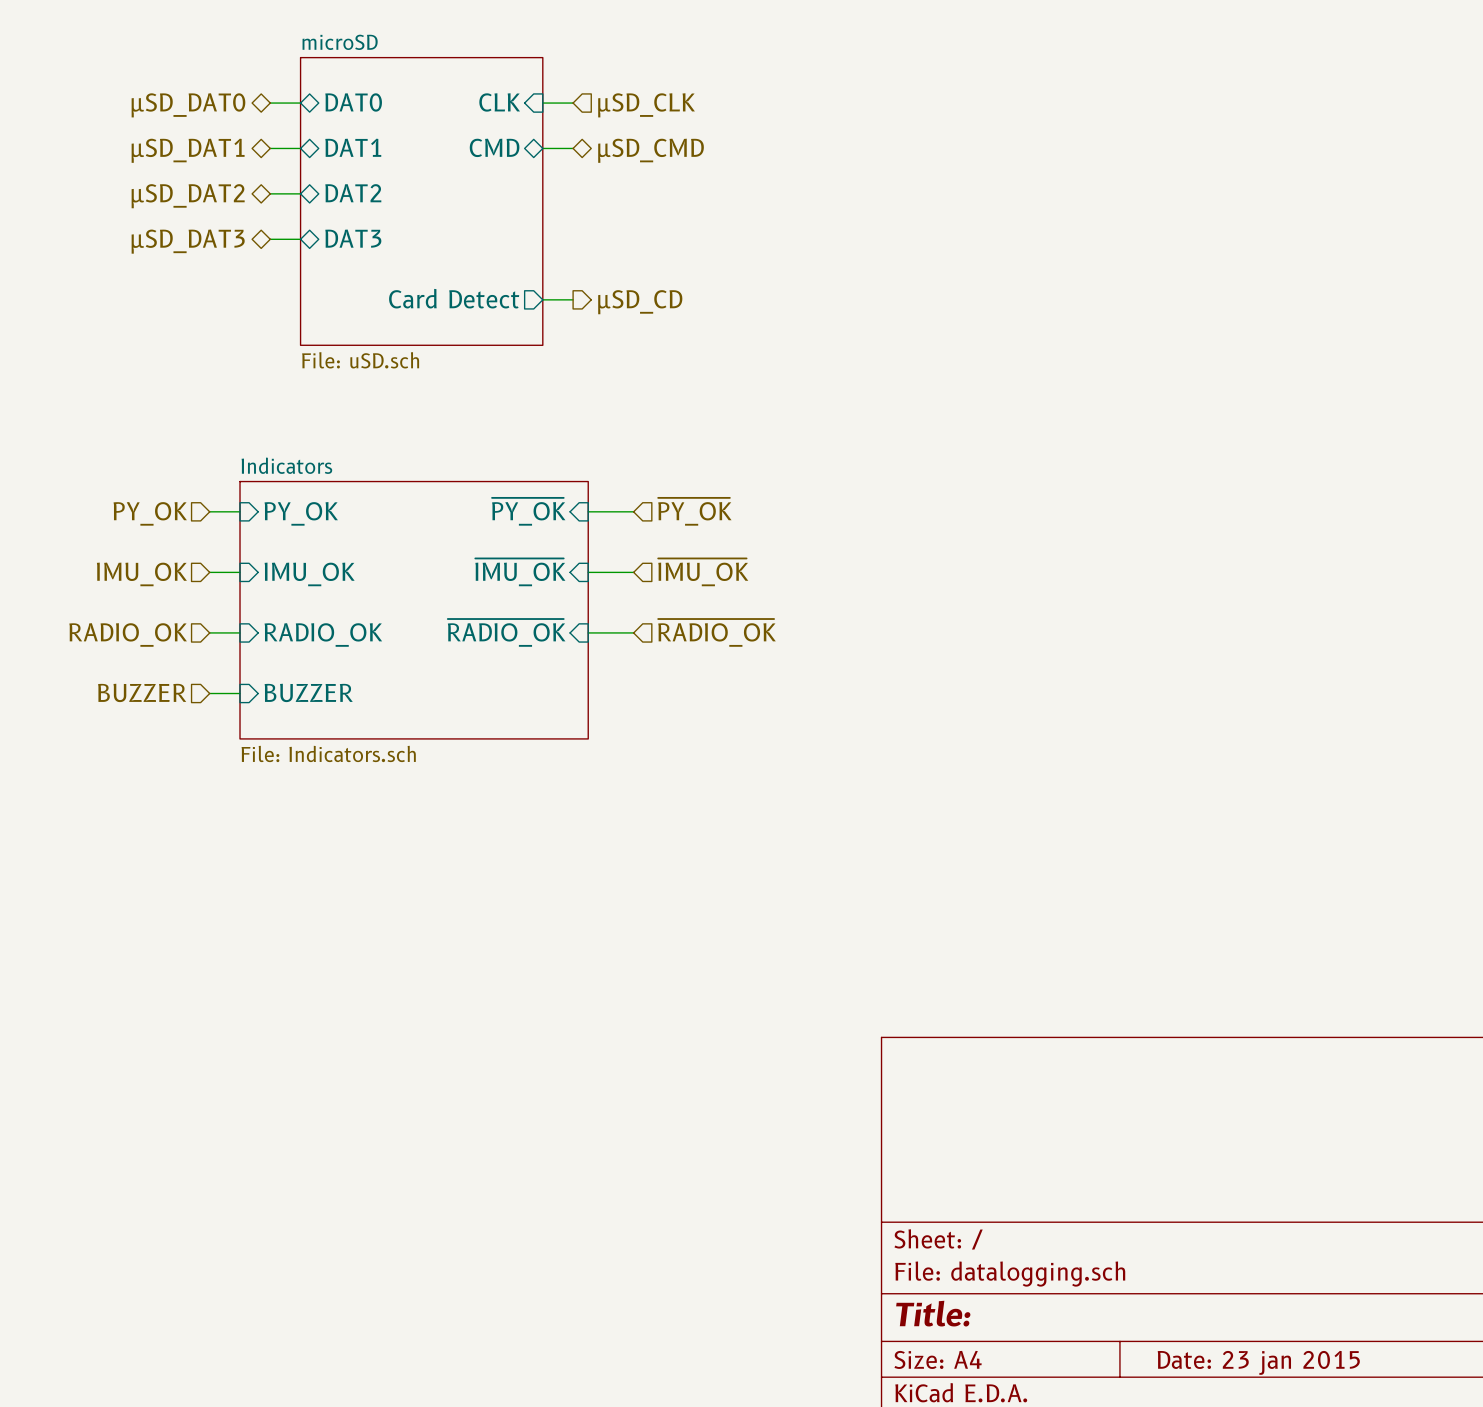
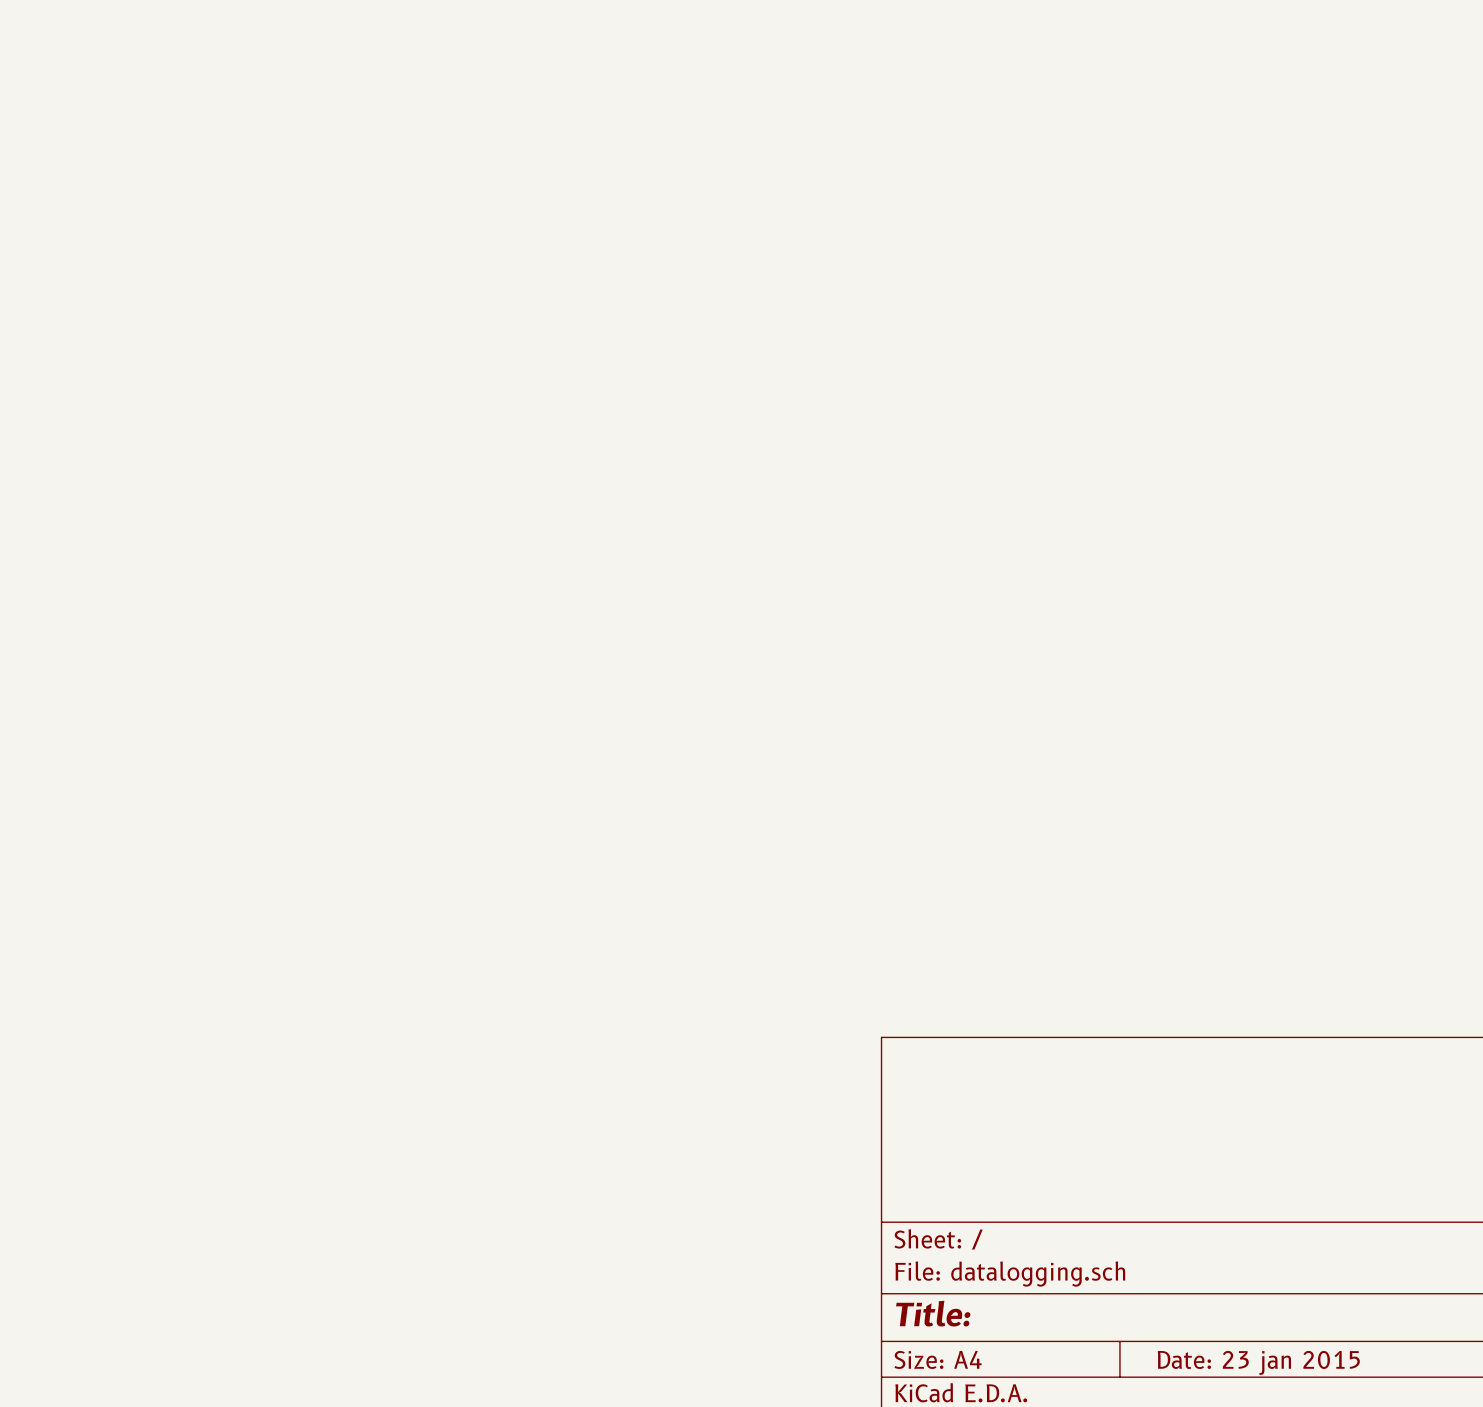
sheet pin: DAT0 (353, 102) -> none
sheet pin: CLK (499, 102) -> none
wire: (270, 103) (300, 103) -> none
wire: (542, 103) (573, 103) -> none
hierarchical label: µSD_DAT0 (188, 105) -> none
hierarchical label: µSD_CLK (646, 105) -> none
sheet pin: DAT1 (353, 147) -> none
sheet pin: CMD (494, 147) -> none
wire: (270, 148) (300, 148) -> none
wire: (542, 148) (573, 148) -> none
hierarchical label: µSD_DAT1 (188, 150) -> none
hierarchical label: µSD_CMD (651, 150) -> none
wire: (270, 193) (300, 193) -> none
sheet pin: DAT2 (353, 193) -> none
hierarchical label: µSD_DAT2 (188, 196) -> none
sheet microSD: File: uSD.sch (421, 201) -> none
sheet pin: DAT3 (353, 238) -> none
wire: (270, 239) (300, 239) -> none
hierarchical label: µSD_DAT3 (188, 241) -> none
sheet pin: Card Detect (454, 298) -> none
wire: (542, 299) (573, 299) -> none
hierarchical label: µSD_CD (640, 302) -> none
wire: (209, 511) (240, 511) -> none
sheet pin: ~{PY_OK} (528, 511) -> none
wire: (588, 511) (633, 511) -> none
hierarchical label: ~{PY_OK} (694, 511) -> none
hierarchical label: PY_OK (150, 513) -> none
sheet pin: PY_OK (301, 513) -> none
wire: (209, 572) (240, 572) -> none
sheet pin: ~{IMU_OK} (520, 572) -> none
wire: (588, 572) (633, 572) -> none
hierarchical label: ~{IMU_OK} (703, 572) -> none
hierarchical label: IMU_OK (141, 574) -> none
sheet pin: IMU_OK (309, 574) -> none
sheet Indicators: File: Indicators.sch (414, 610) -> none
wire: (209, 632) (240, 632) -> none
sheet pin: ~{RADIO_OK} (506, 632) -> none
wire: (588, 632) (633, 632) -> none
hierarchical label: ~{RADIO_OK} (716, 632) -> none
hierarchical label: RADIO_OK (128, 634) -> none
sheet pin: RADIO_OK (323, 634) -> none
hierarchical label: BUZZER (142, 692) -> none
sheet pin: BUZZER (308, 692) -> none
wire: (209, 693) (240, 693) -> none

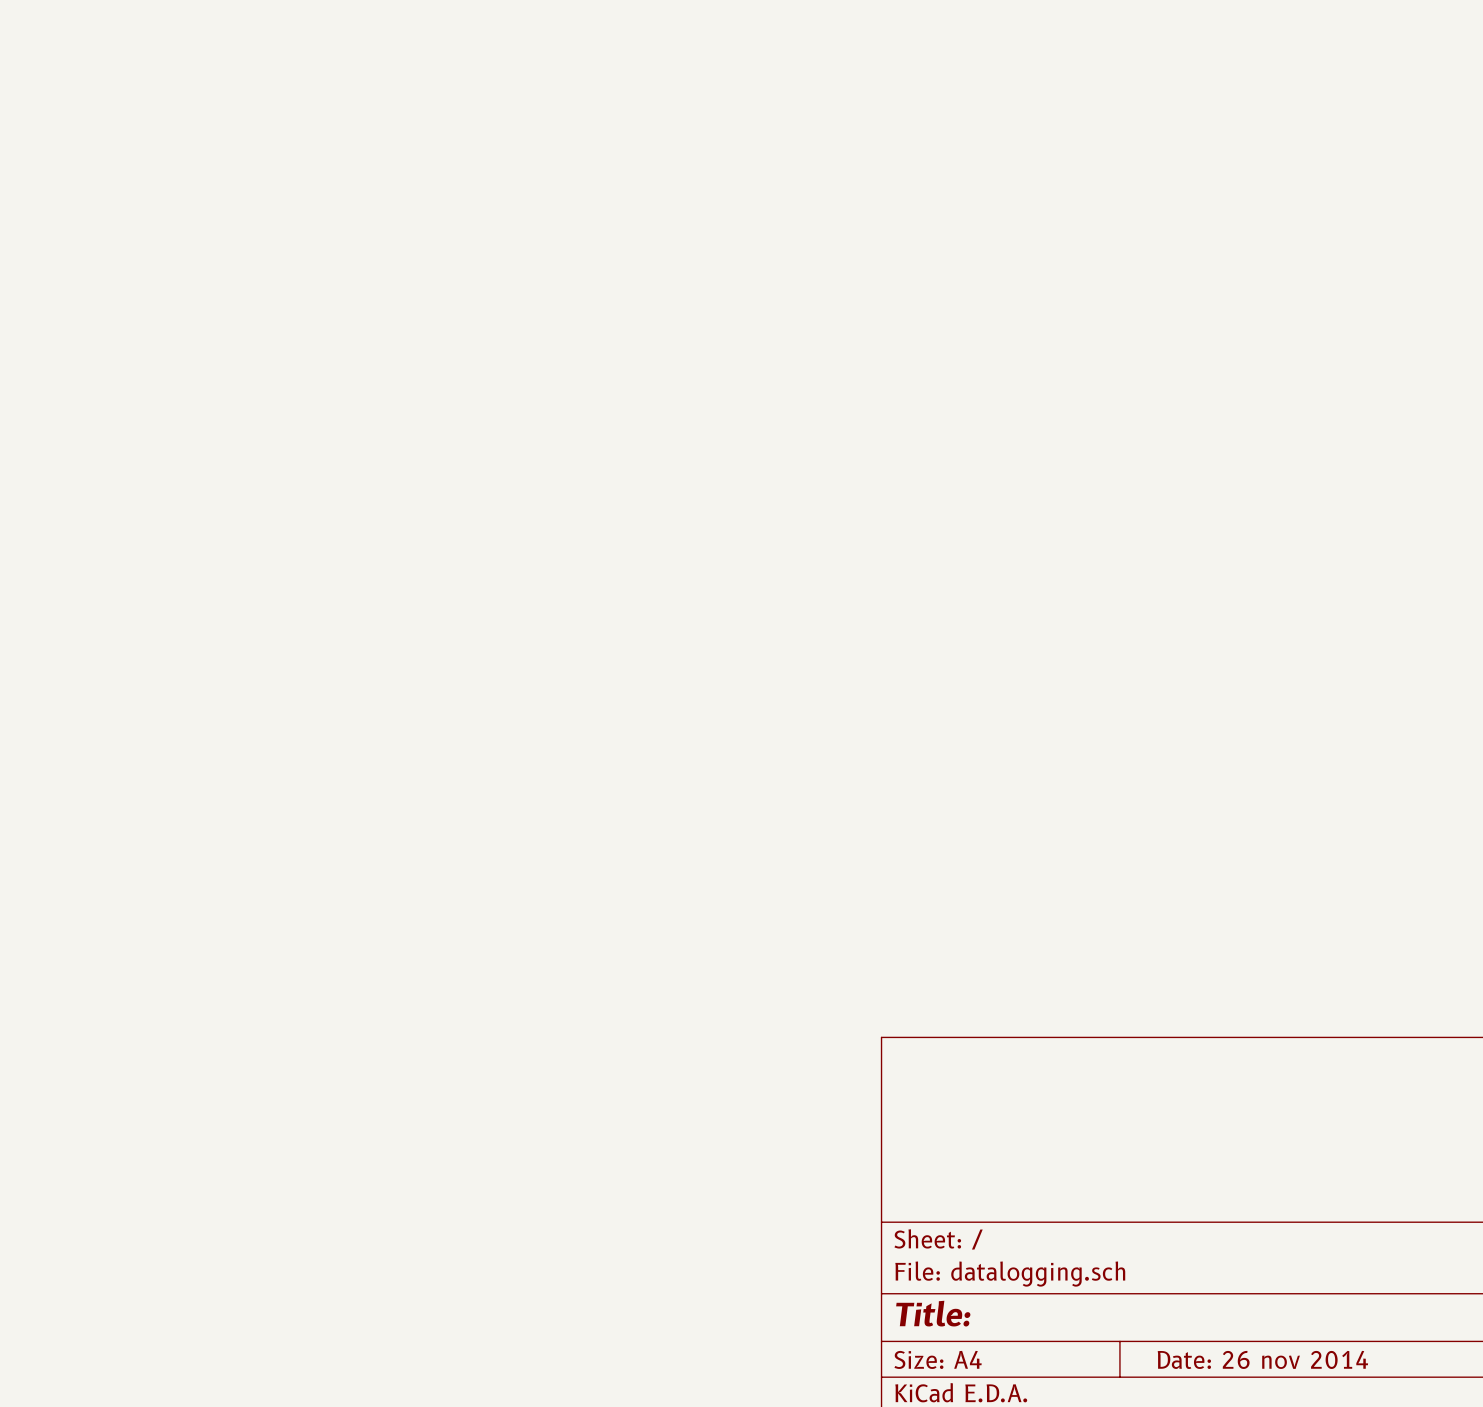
title block: Date: 23 jan 2015 (1258, 1362) -> Date: 26 nov 2014 (1262, 1359)

